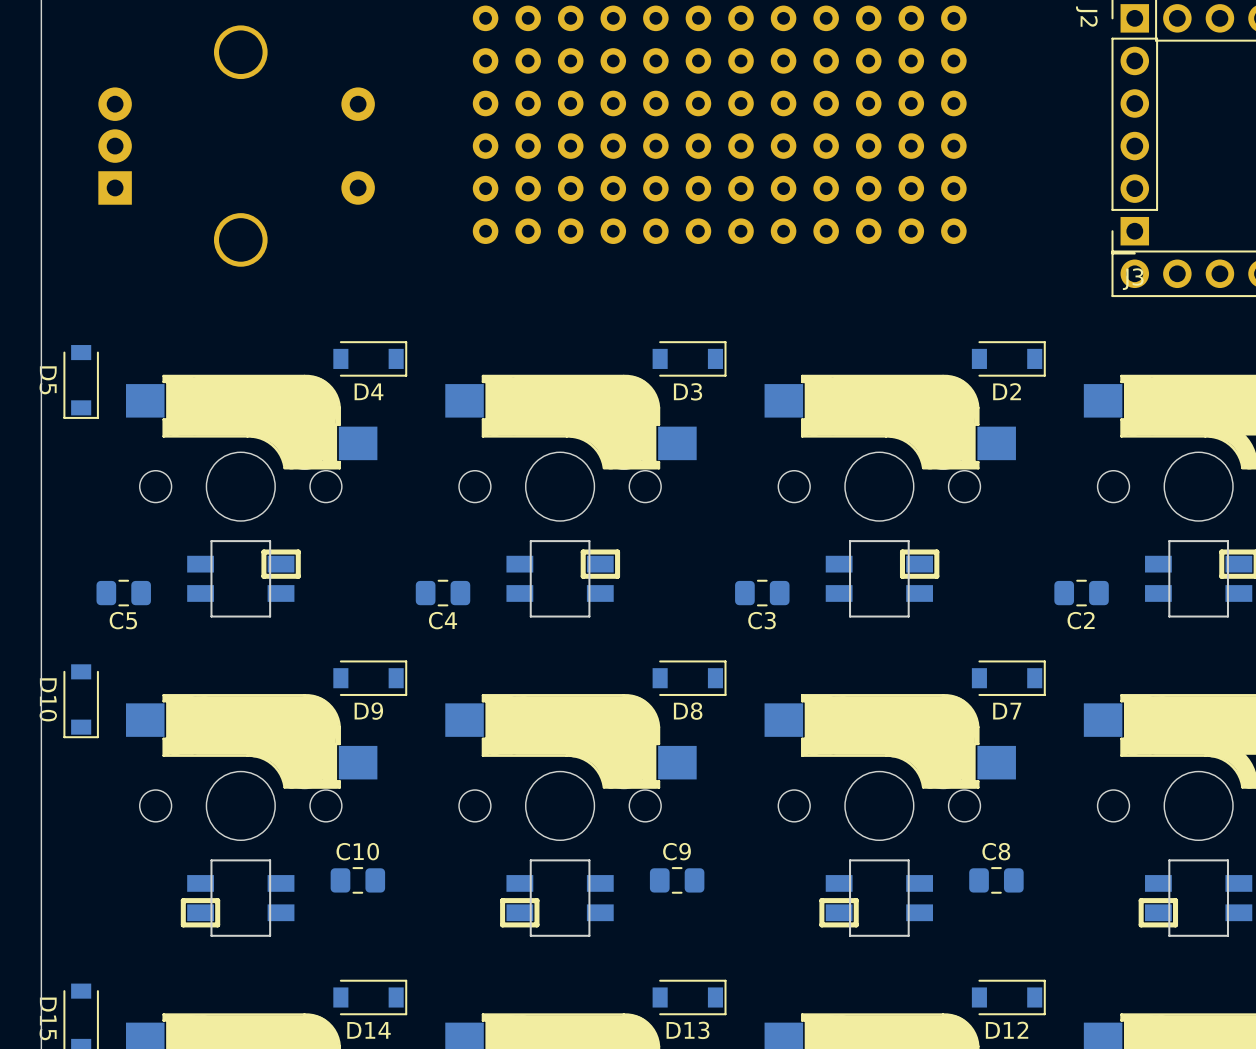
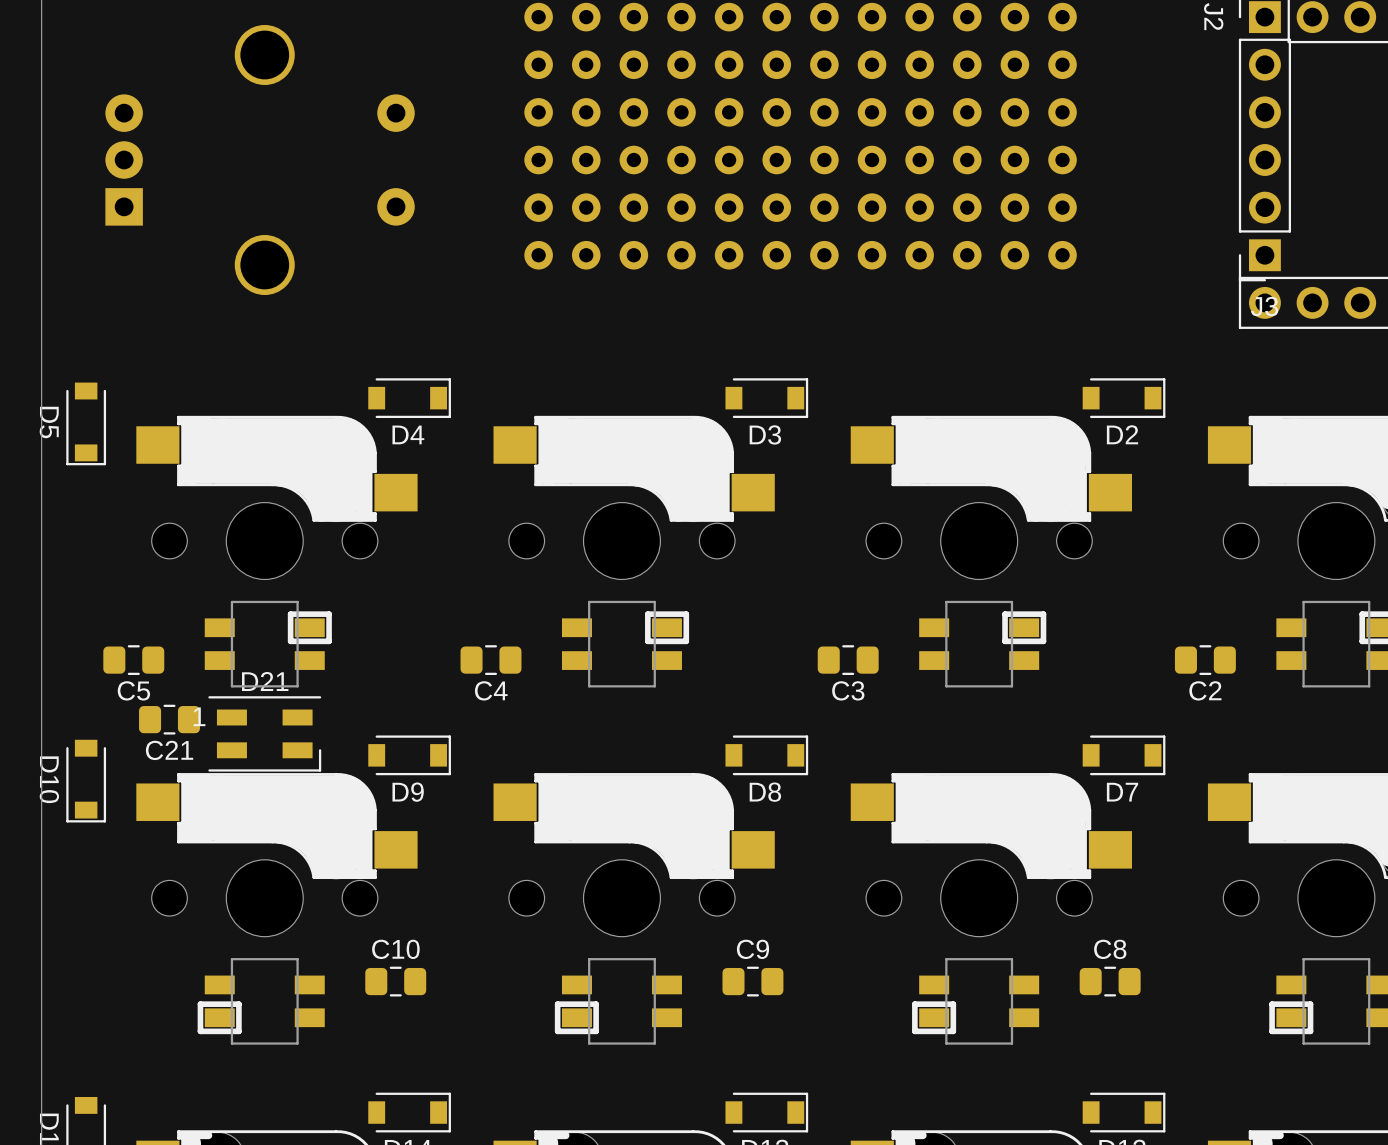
C21: none -> (169, 719)
D21: none -> (264, 733)

